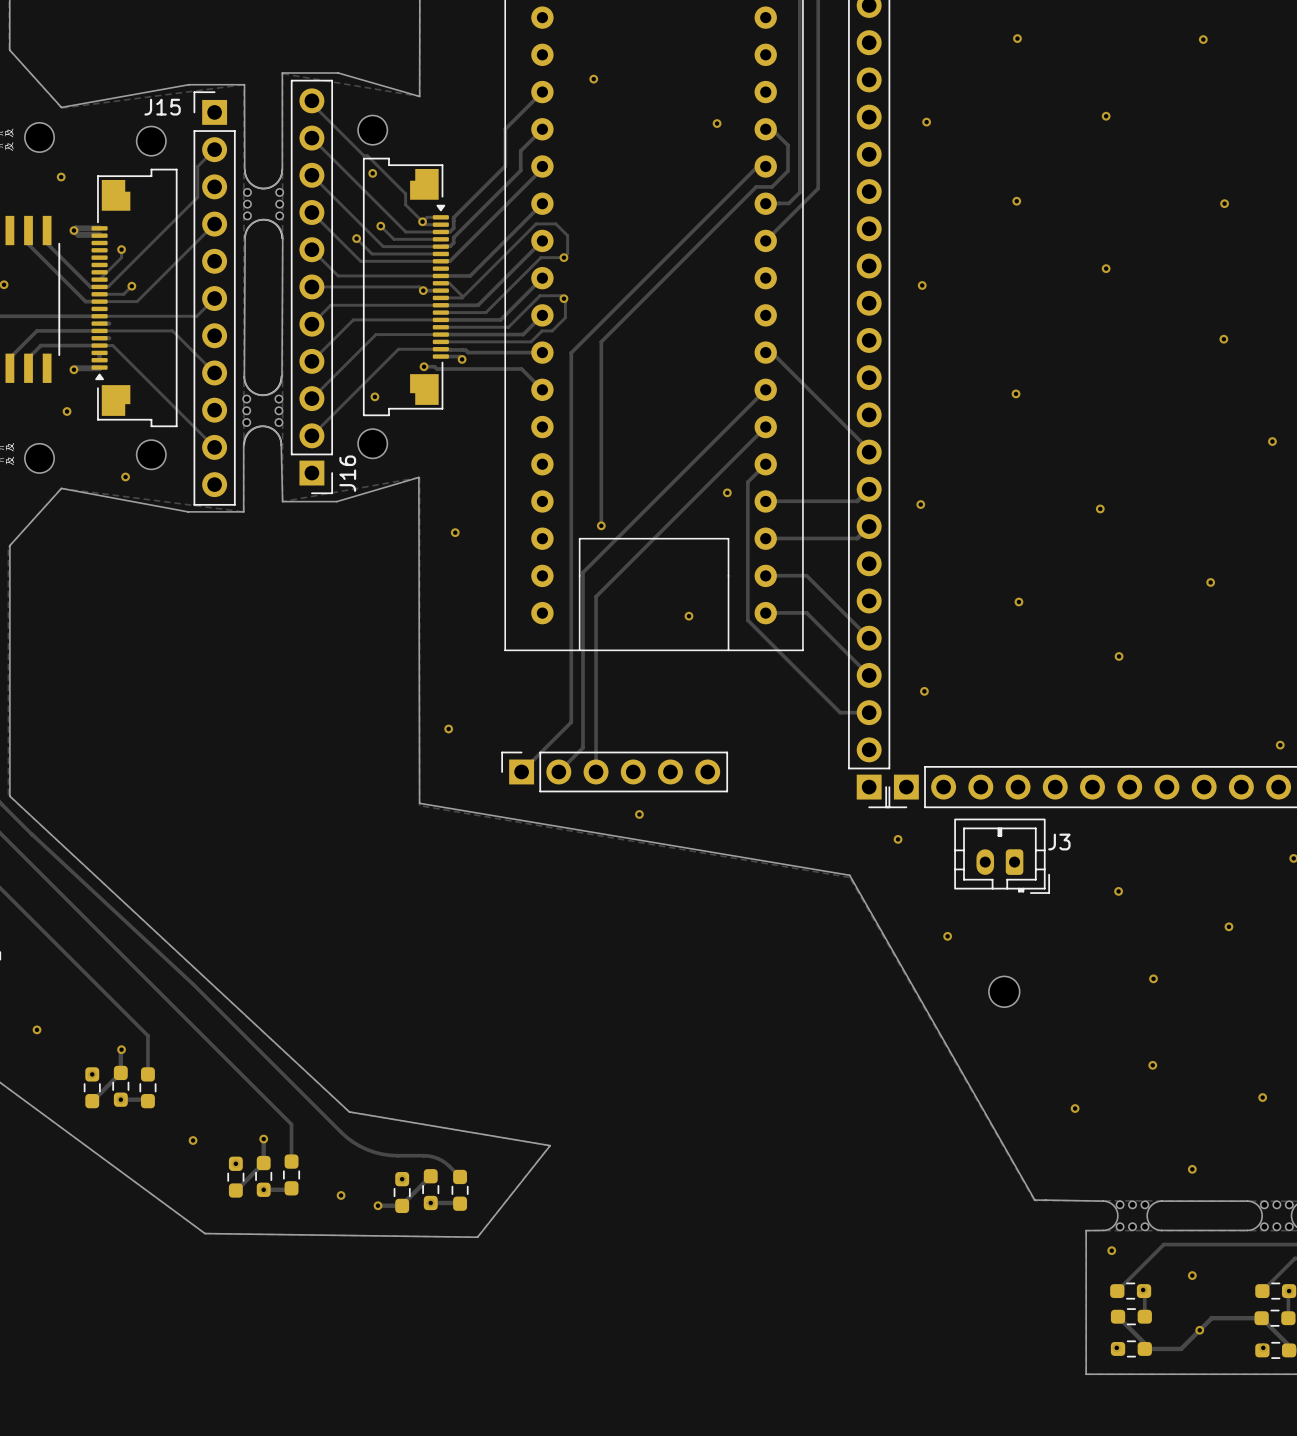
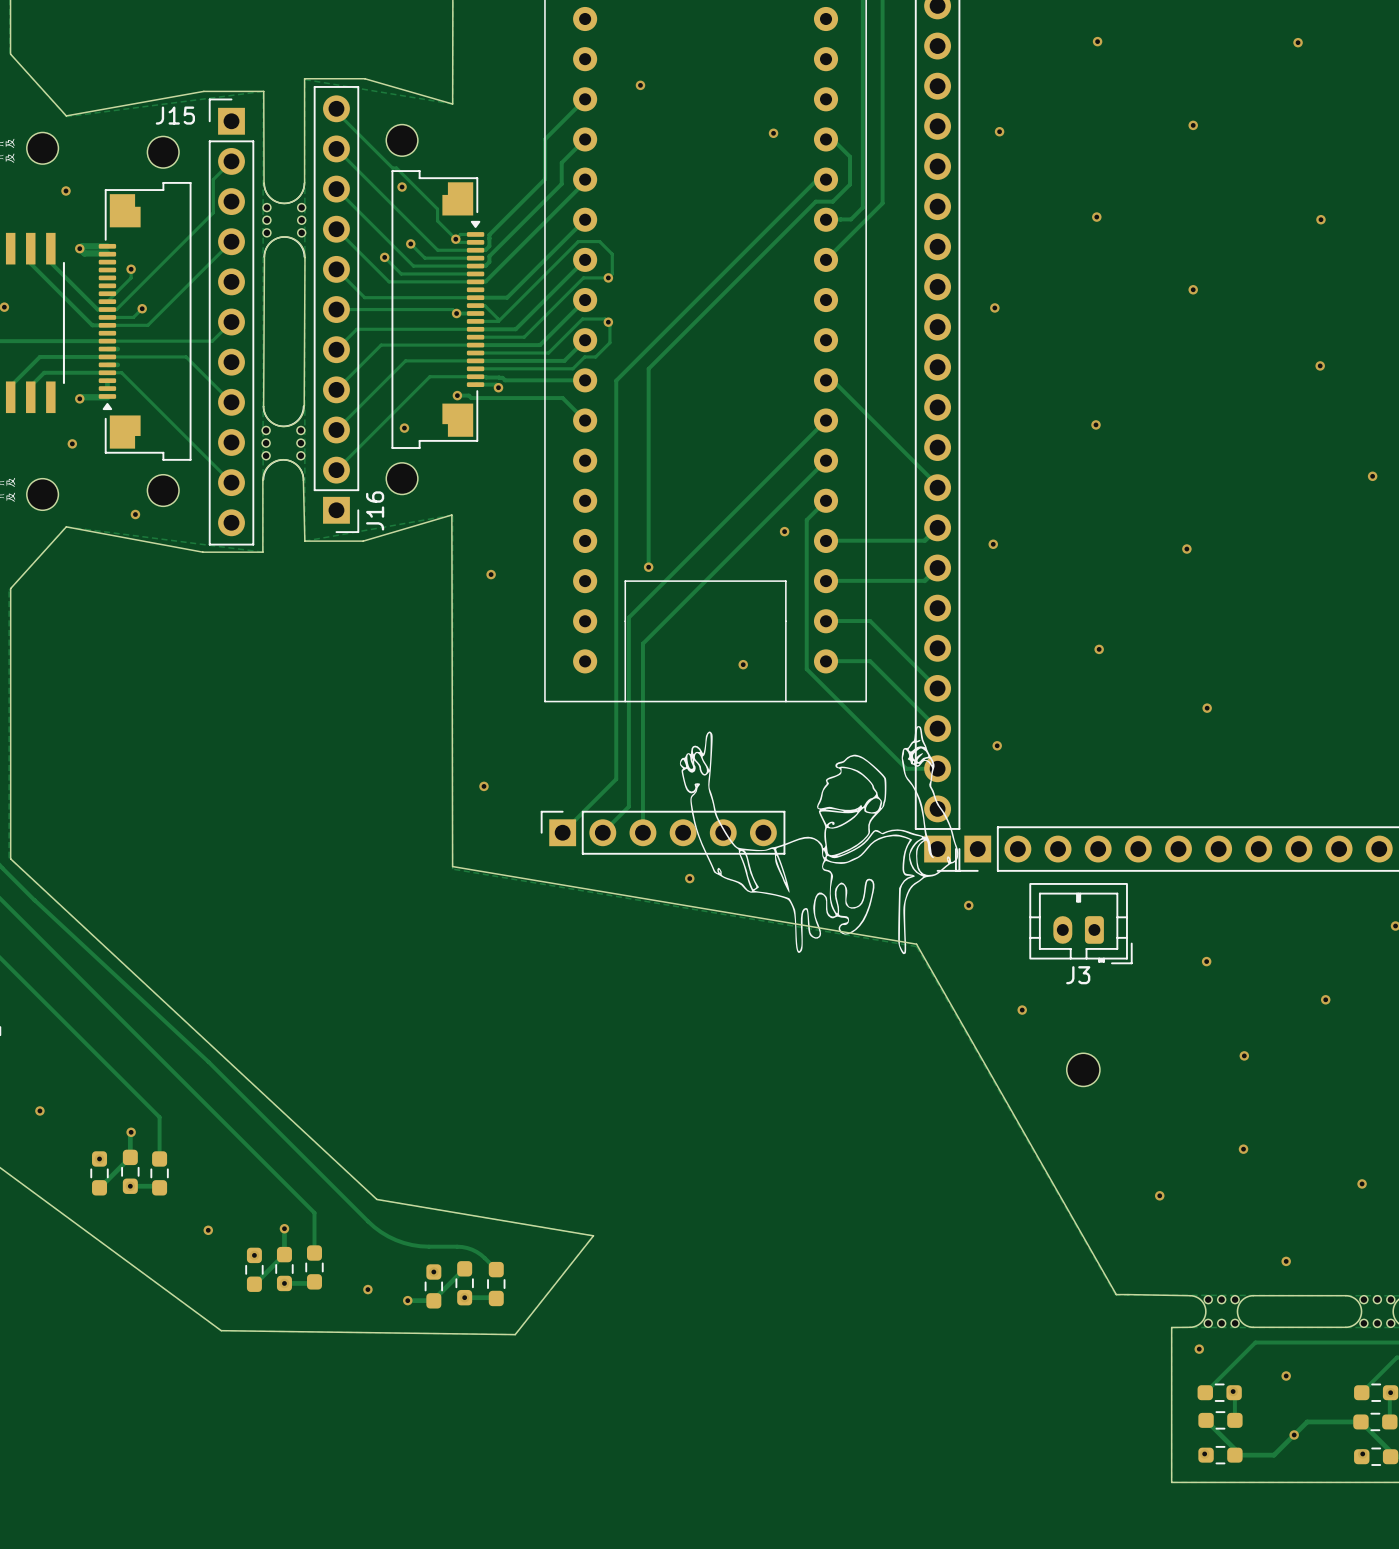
via: (1210, 582) -> none
drawing: none -> [679, 726, 959, 955]
via: (1280, 745) -> none
J3 name position: J3 (1059, 842) -> J3 (1078, 975)

